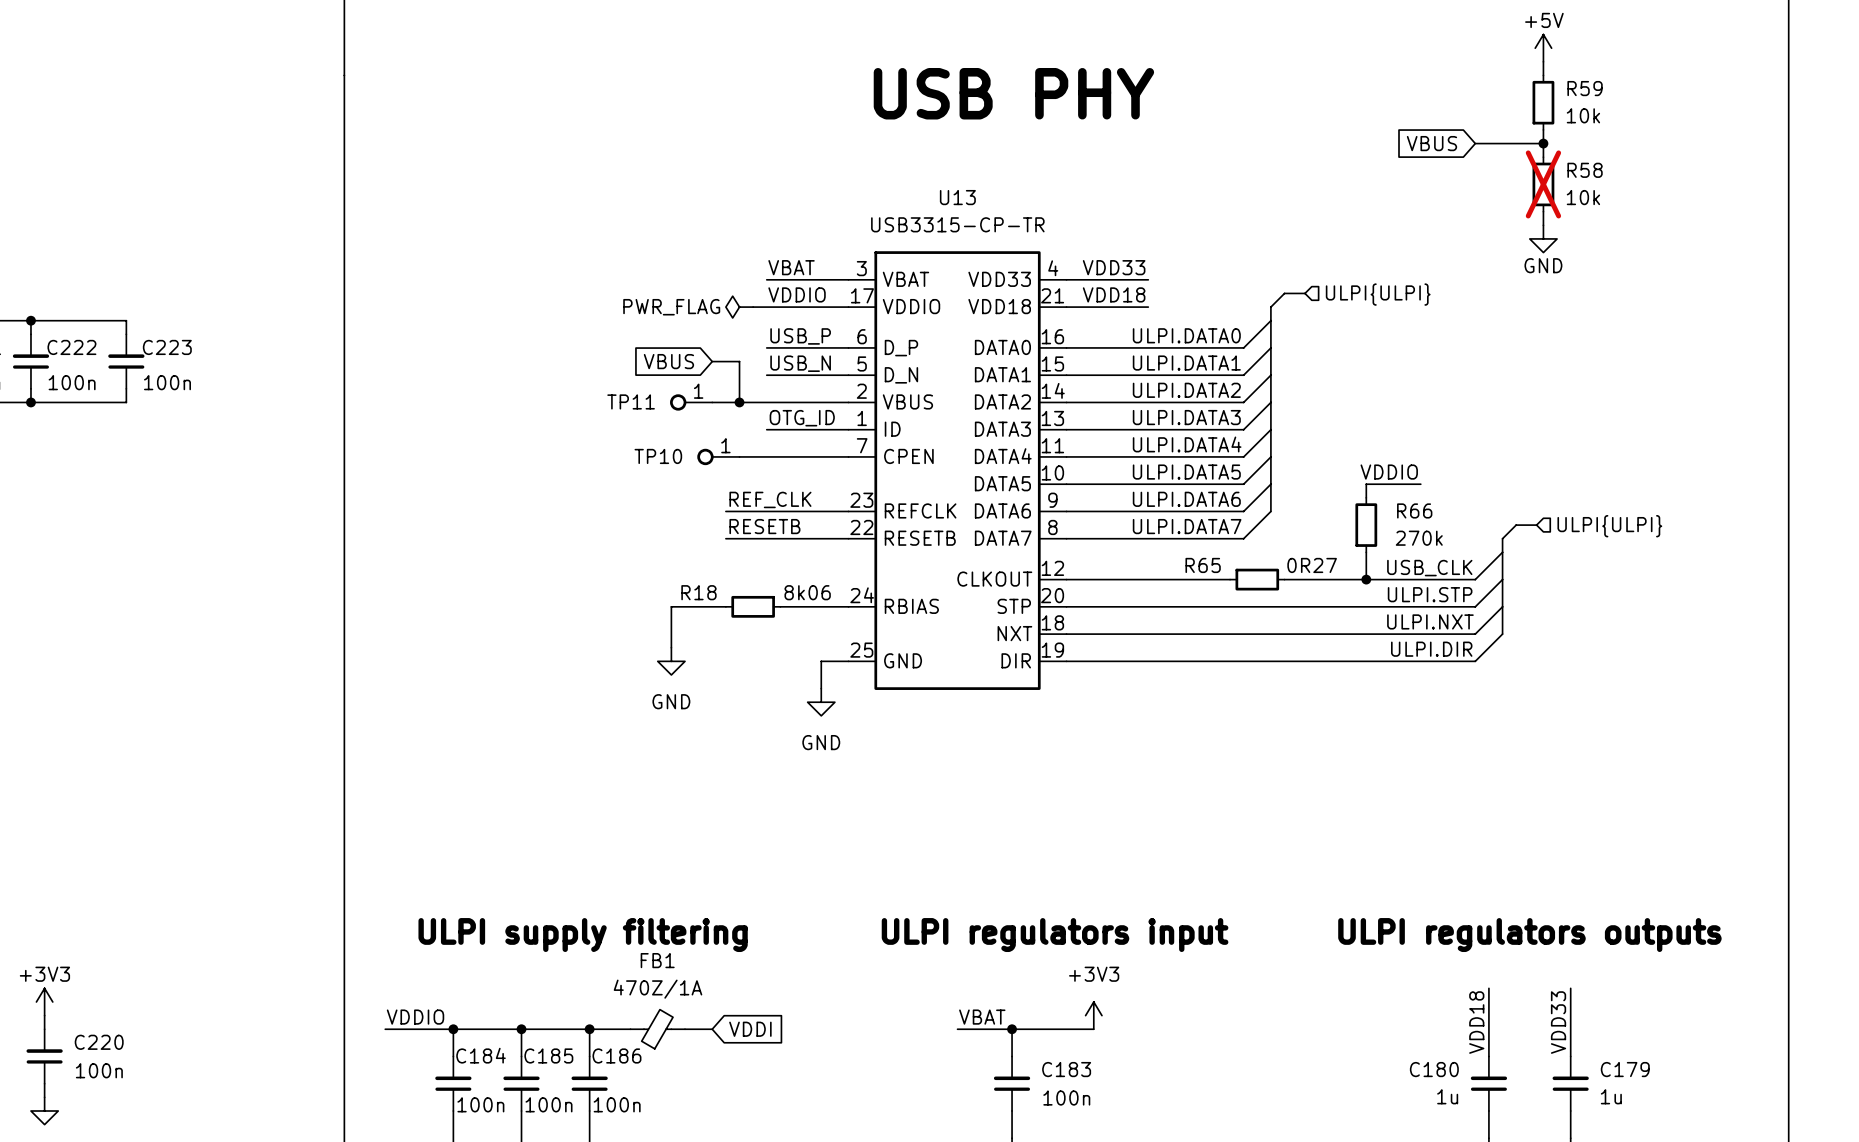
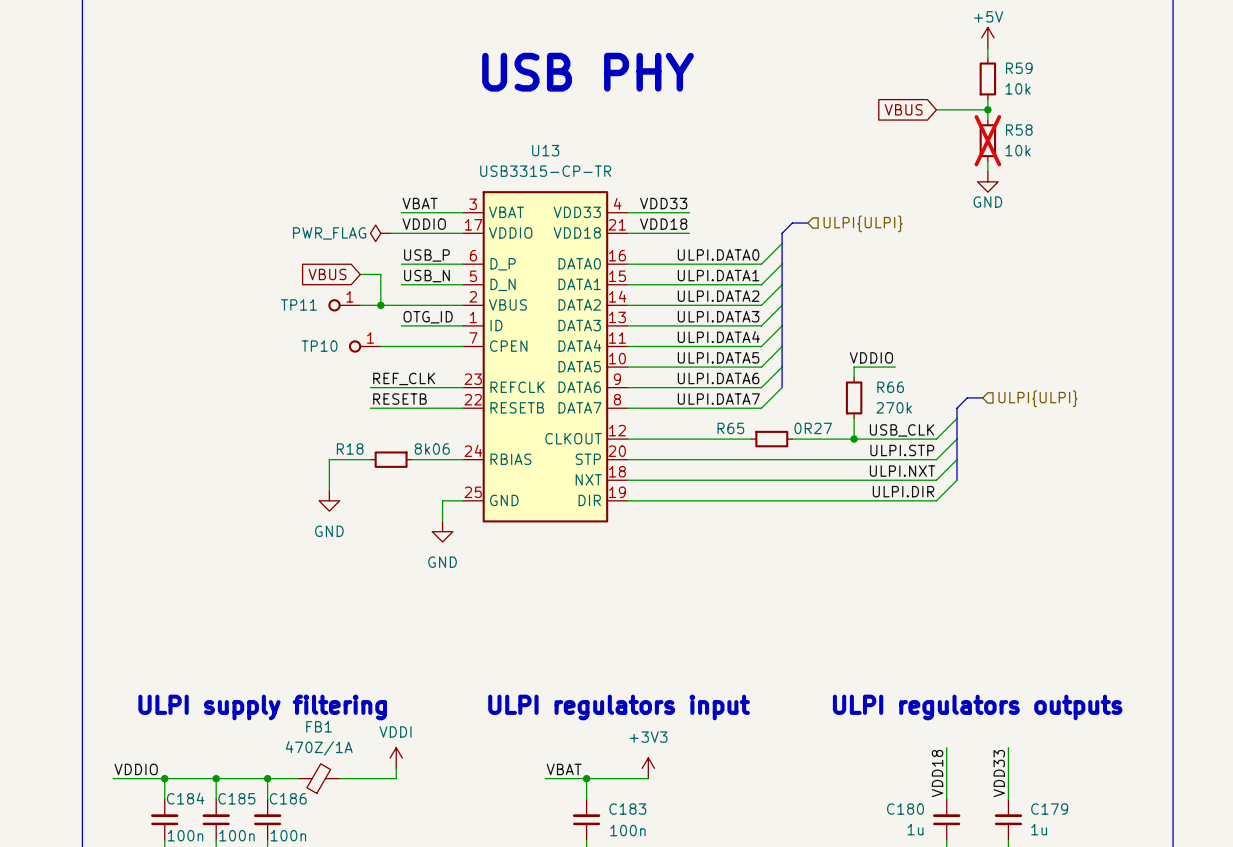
power symbol: none -> VDDI (396, 758)
wire: none -> (396, 768) (396, 778) (360, 778)
global label: VDDI (750, 1029) -> none

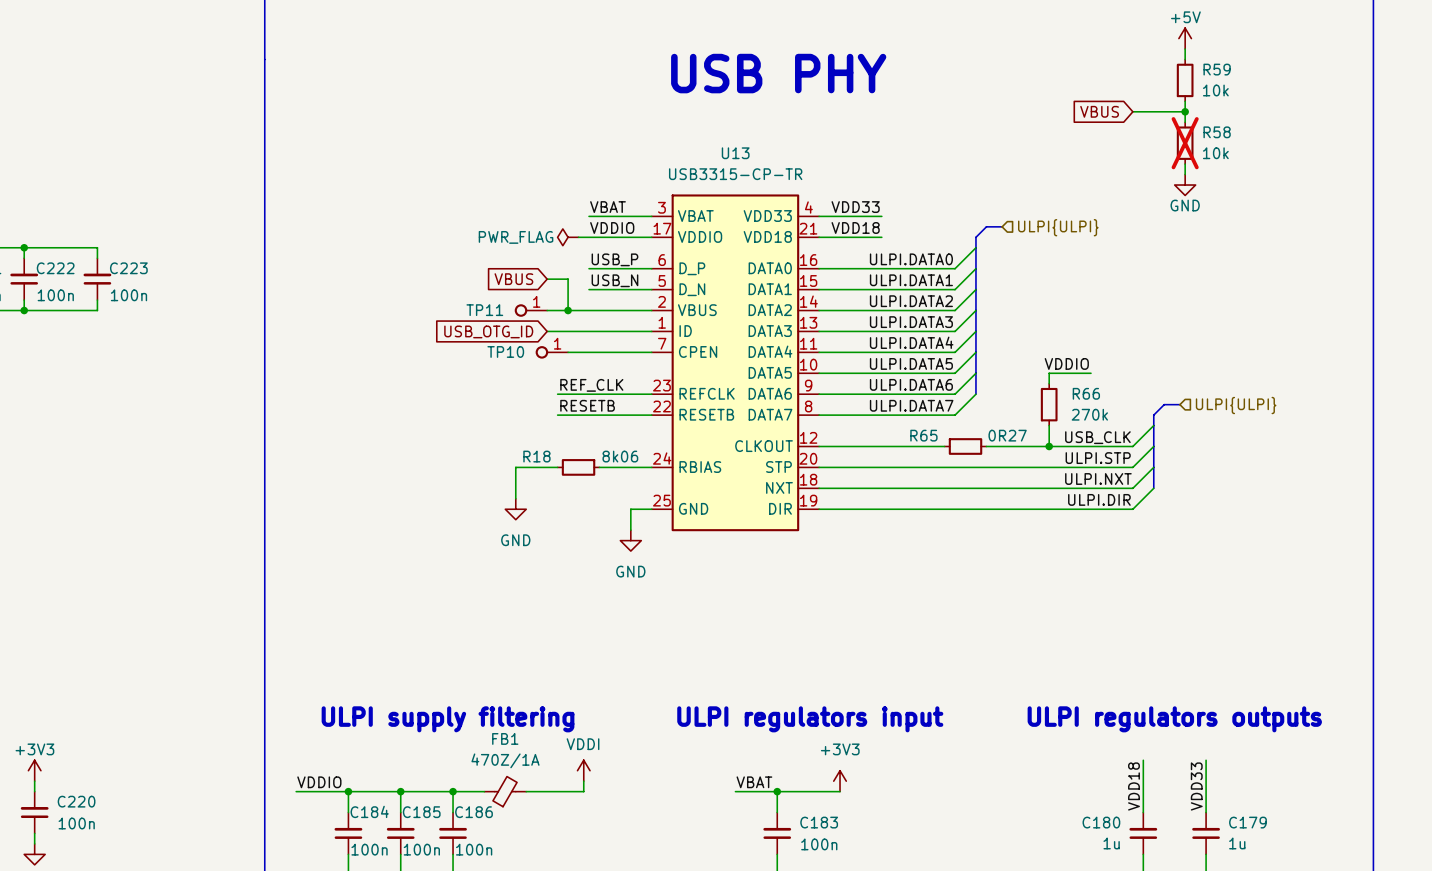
label: OTG_ID (428, 317) -> none
wire: none -> (547, 331) (588, 331)
global label: none -> USB_OTG_ID (488, 331)

